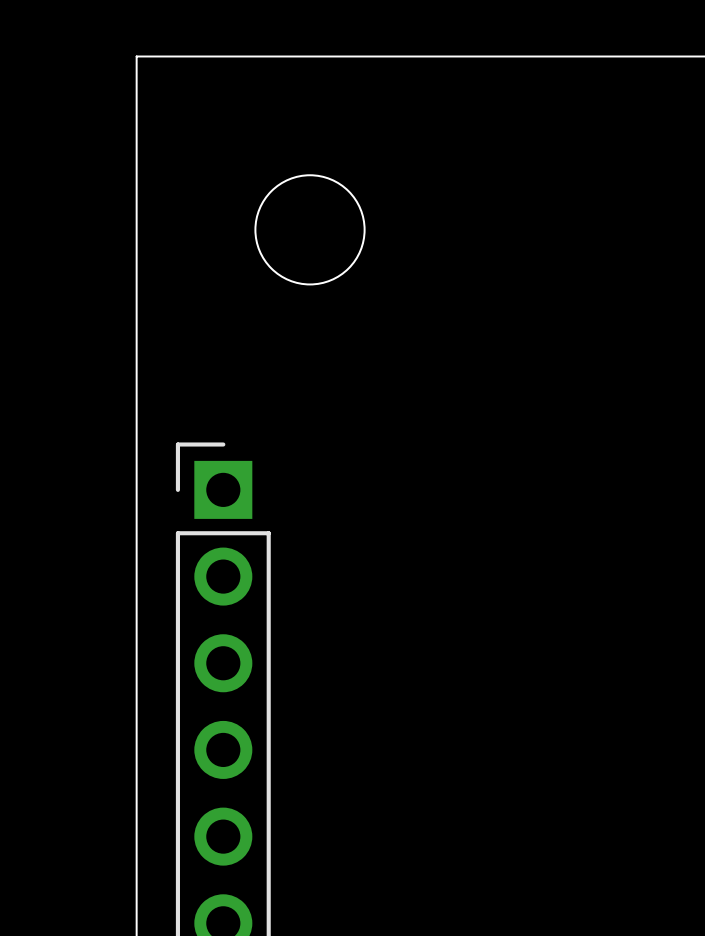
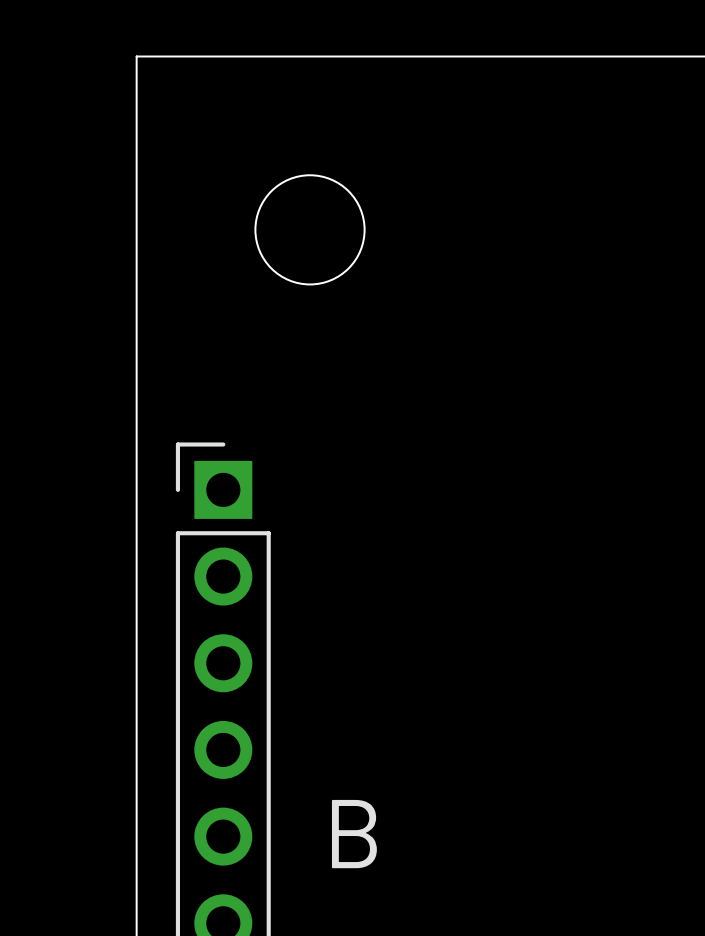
text: none -> B (354, 834)

